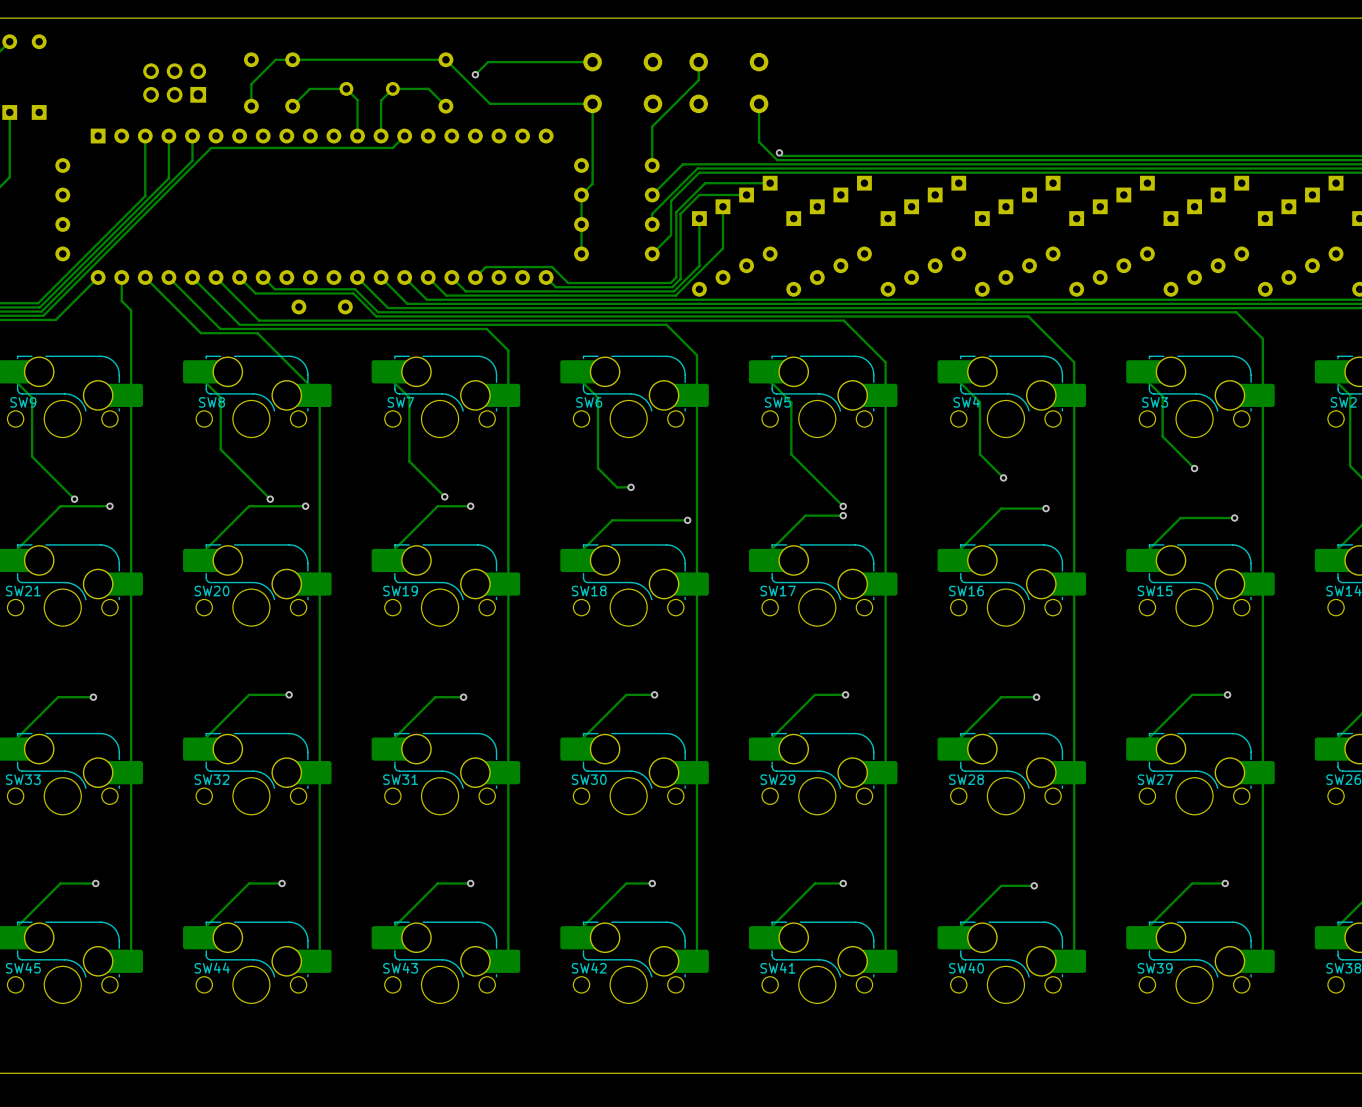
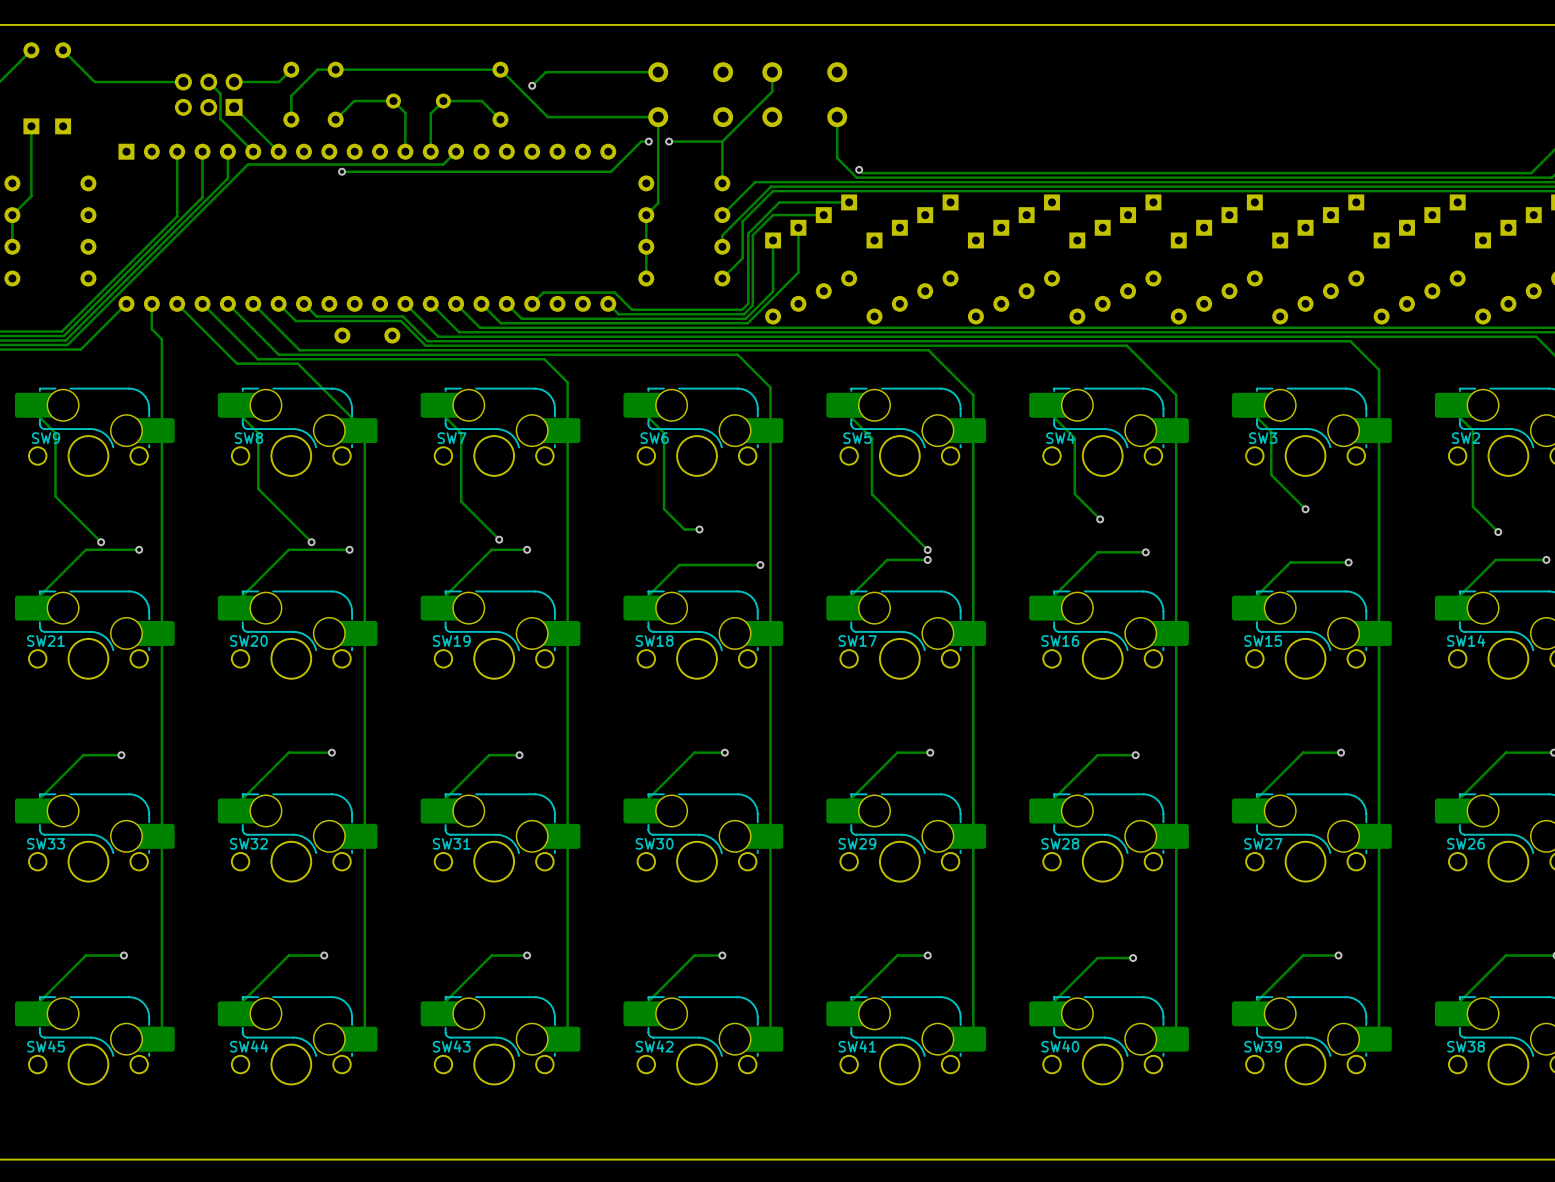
track: none -> (63, 50) (94, 82) (183, 82)
track: none -> (291, 69) (278, 82) (234, 82)
track: none -> (208, 82) (220, 93) (220, 118) (253, 151)
track: none -> (234, 107) (278, 151)
track: none -> (648, 141) (641, 141) (611, 171) (342, 171)
via: none -> (648, 141)
via: none -> (669, 141)
track: none -> (722, 141) (669, 141)
via: none -> (342, 171)

